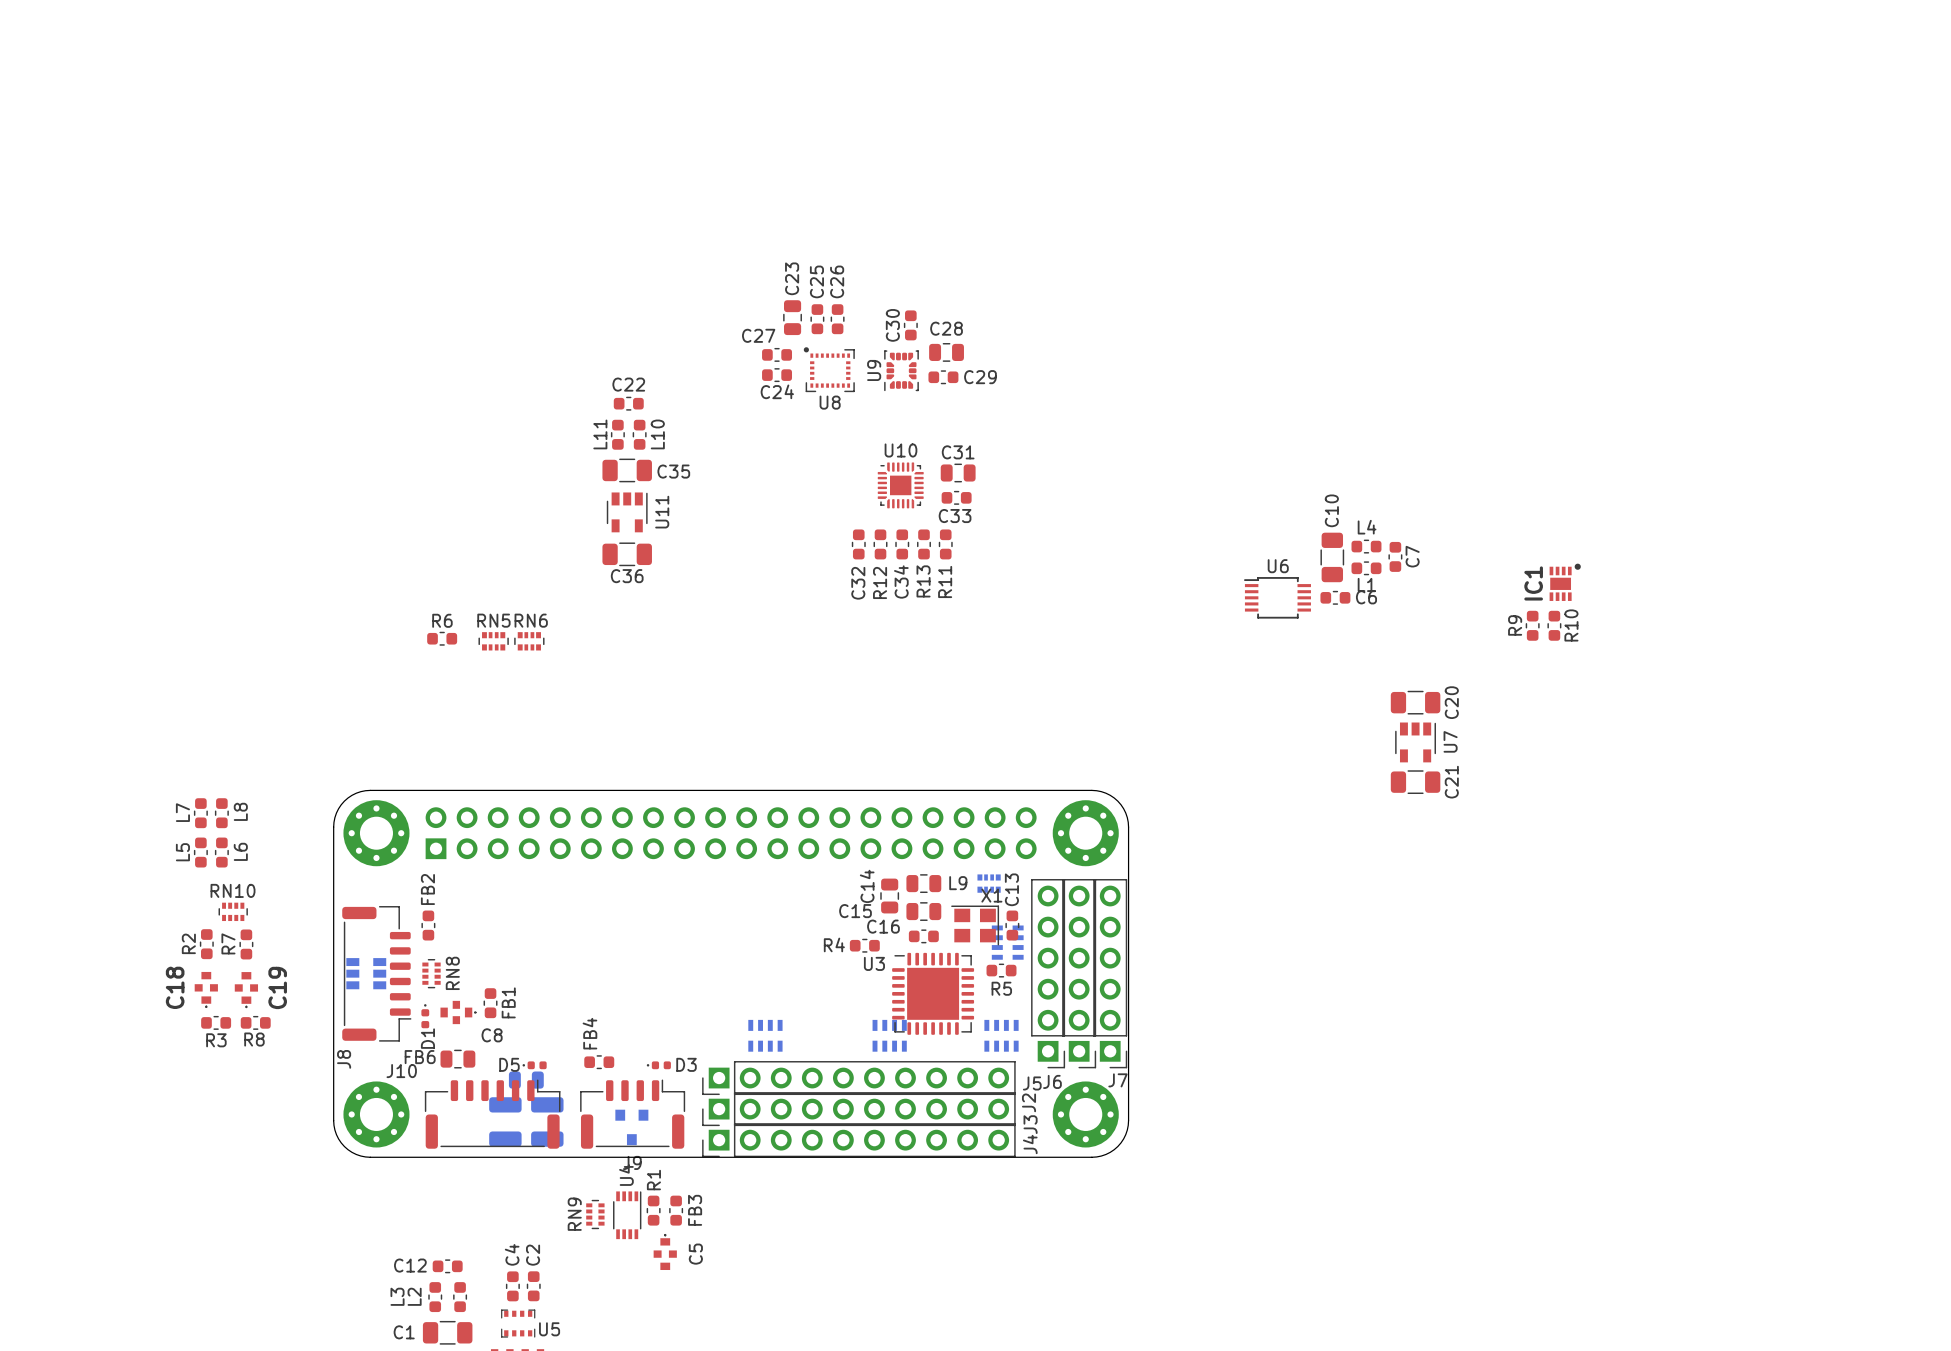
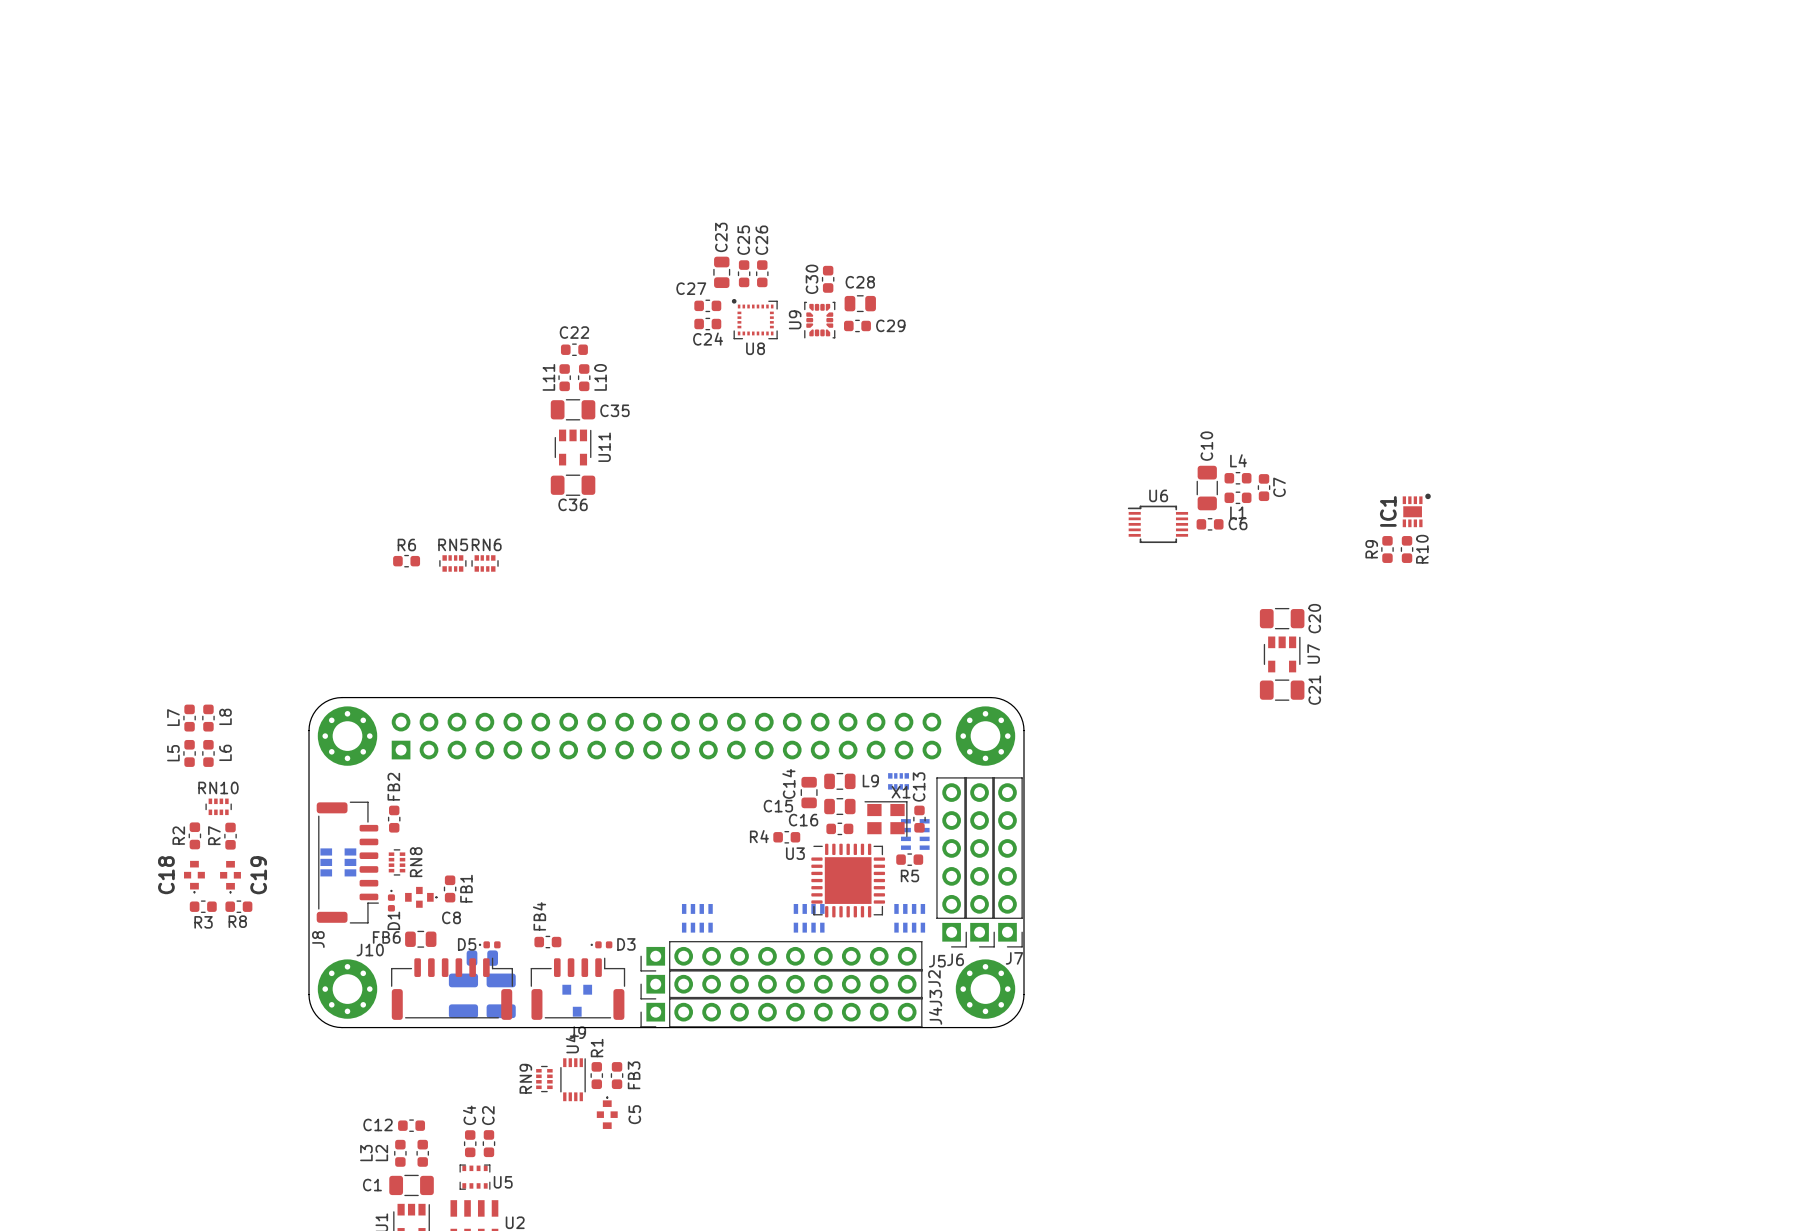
C31: (958, 472) -> none
U10: (900, 485) -> none
C33: (956, 497) -> none
C32: (858, 544) -> none
R12: (880, 544) -> none
C34: (902, 544) -> none
R13: (923, 544) -> none
R11: (945, 544) -> none

